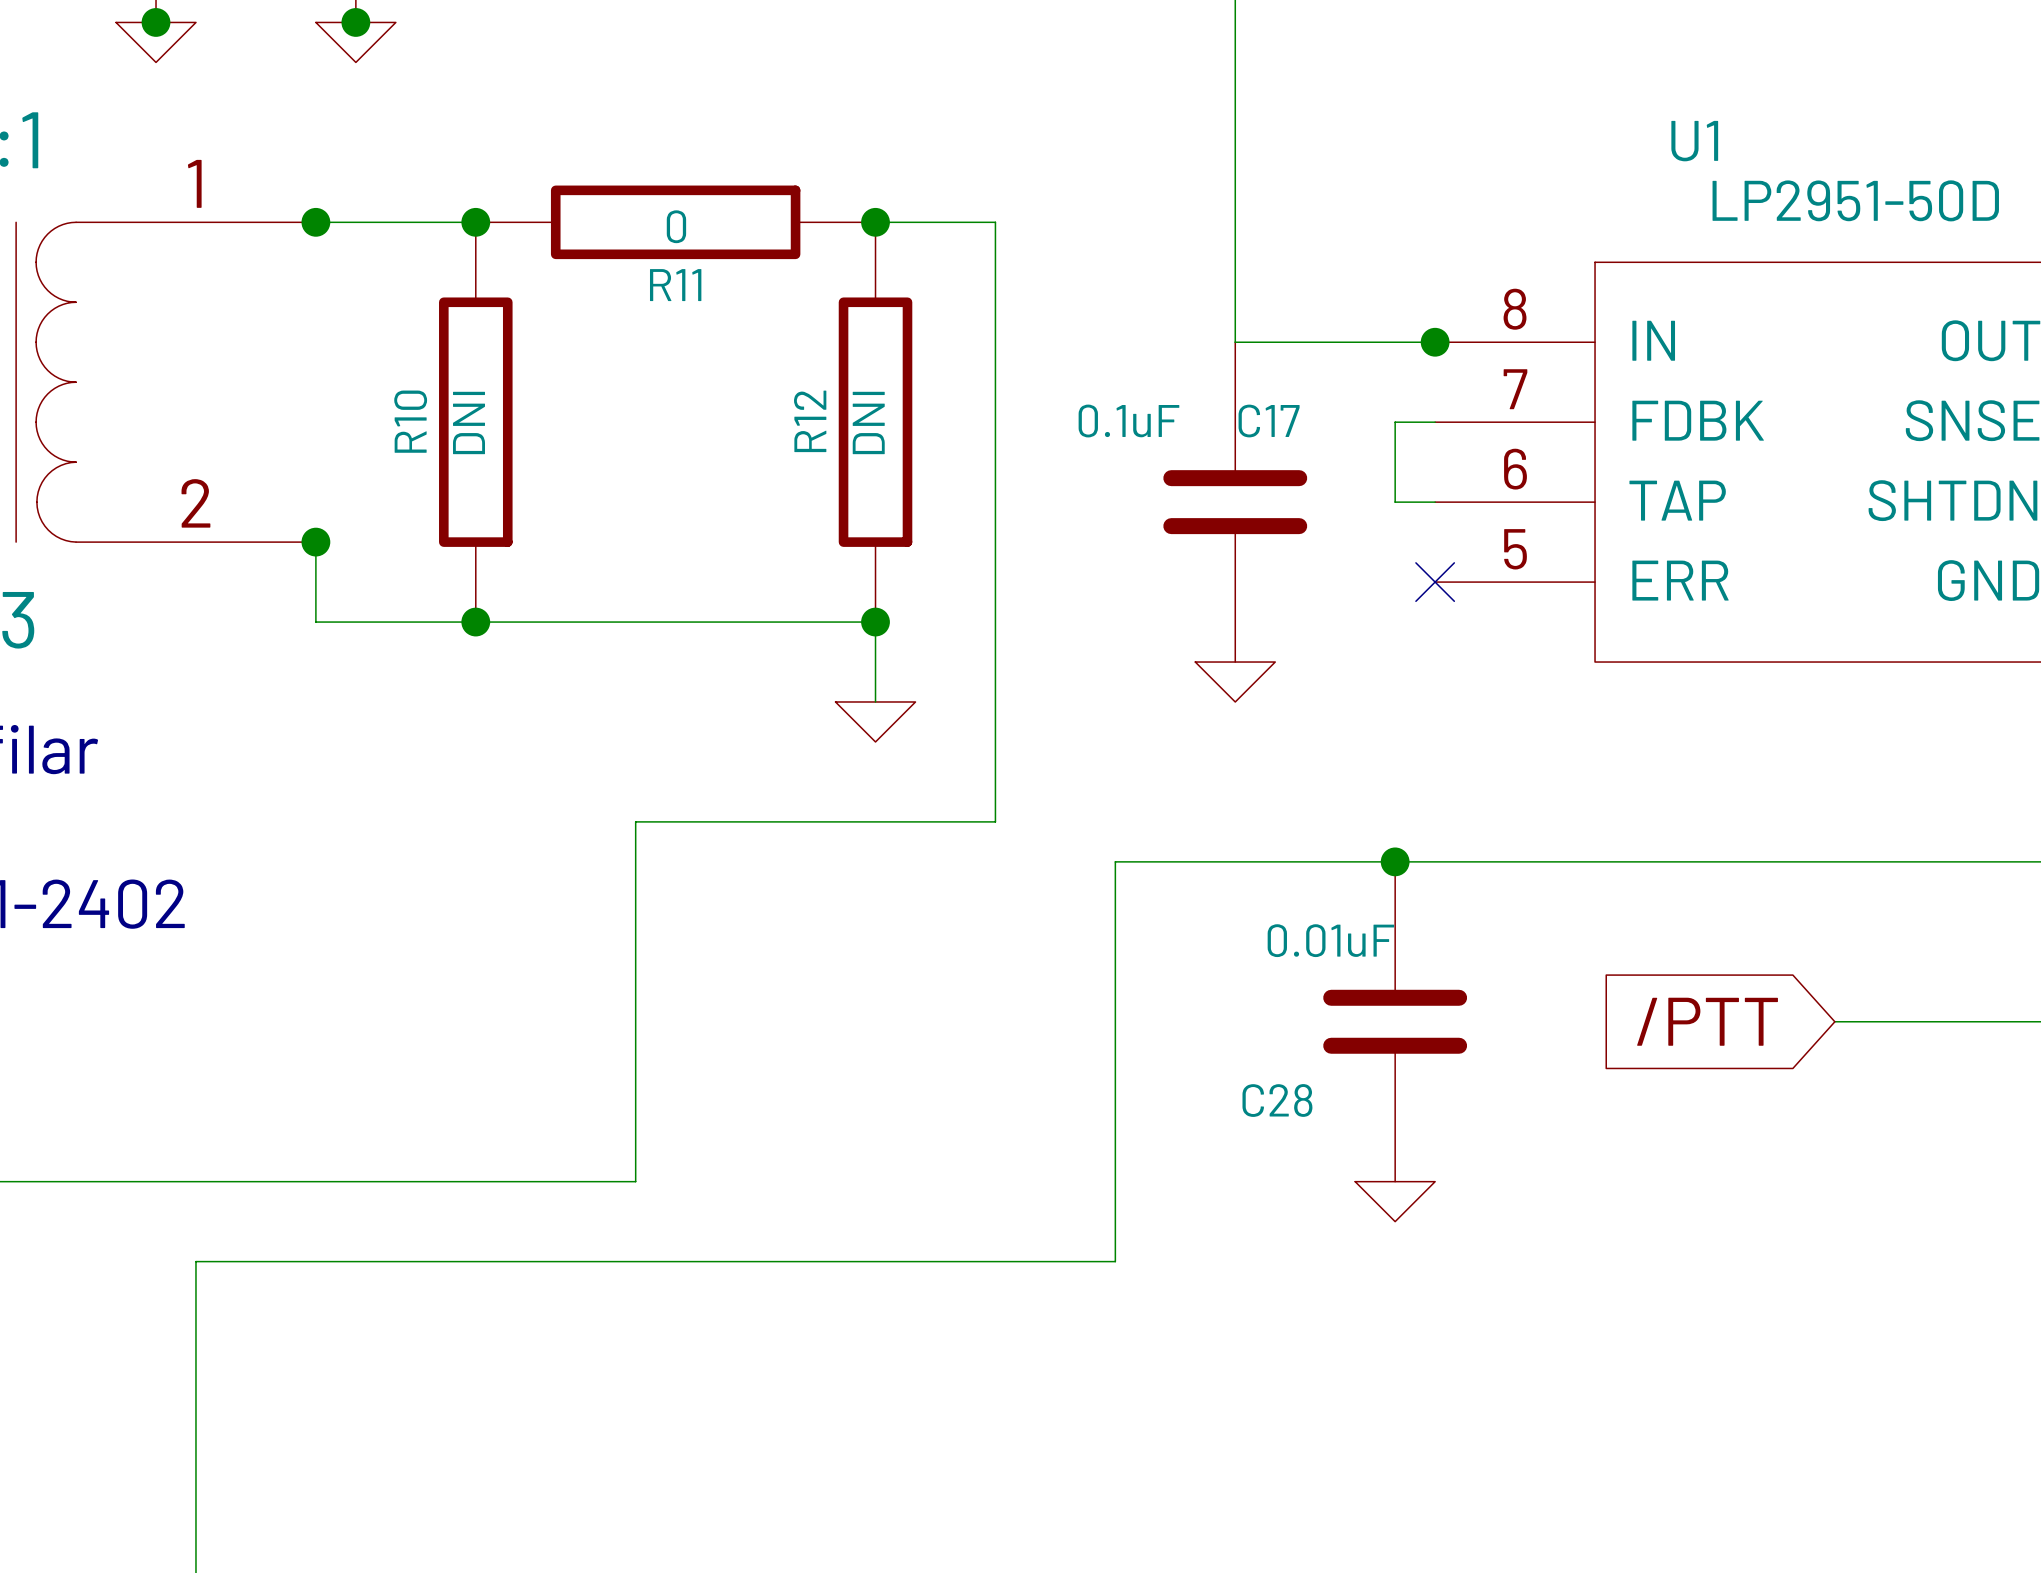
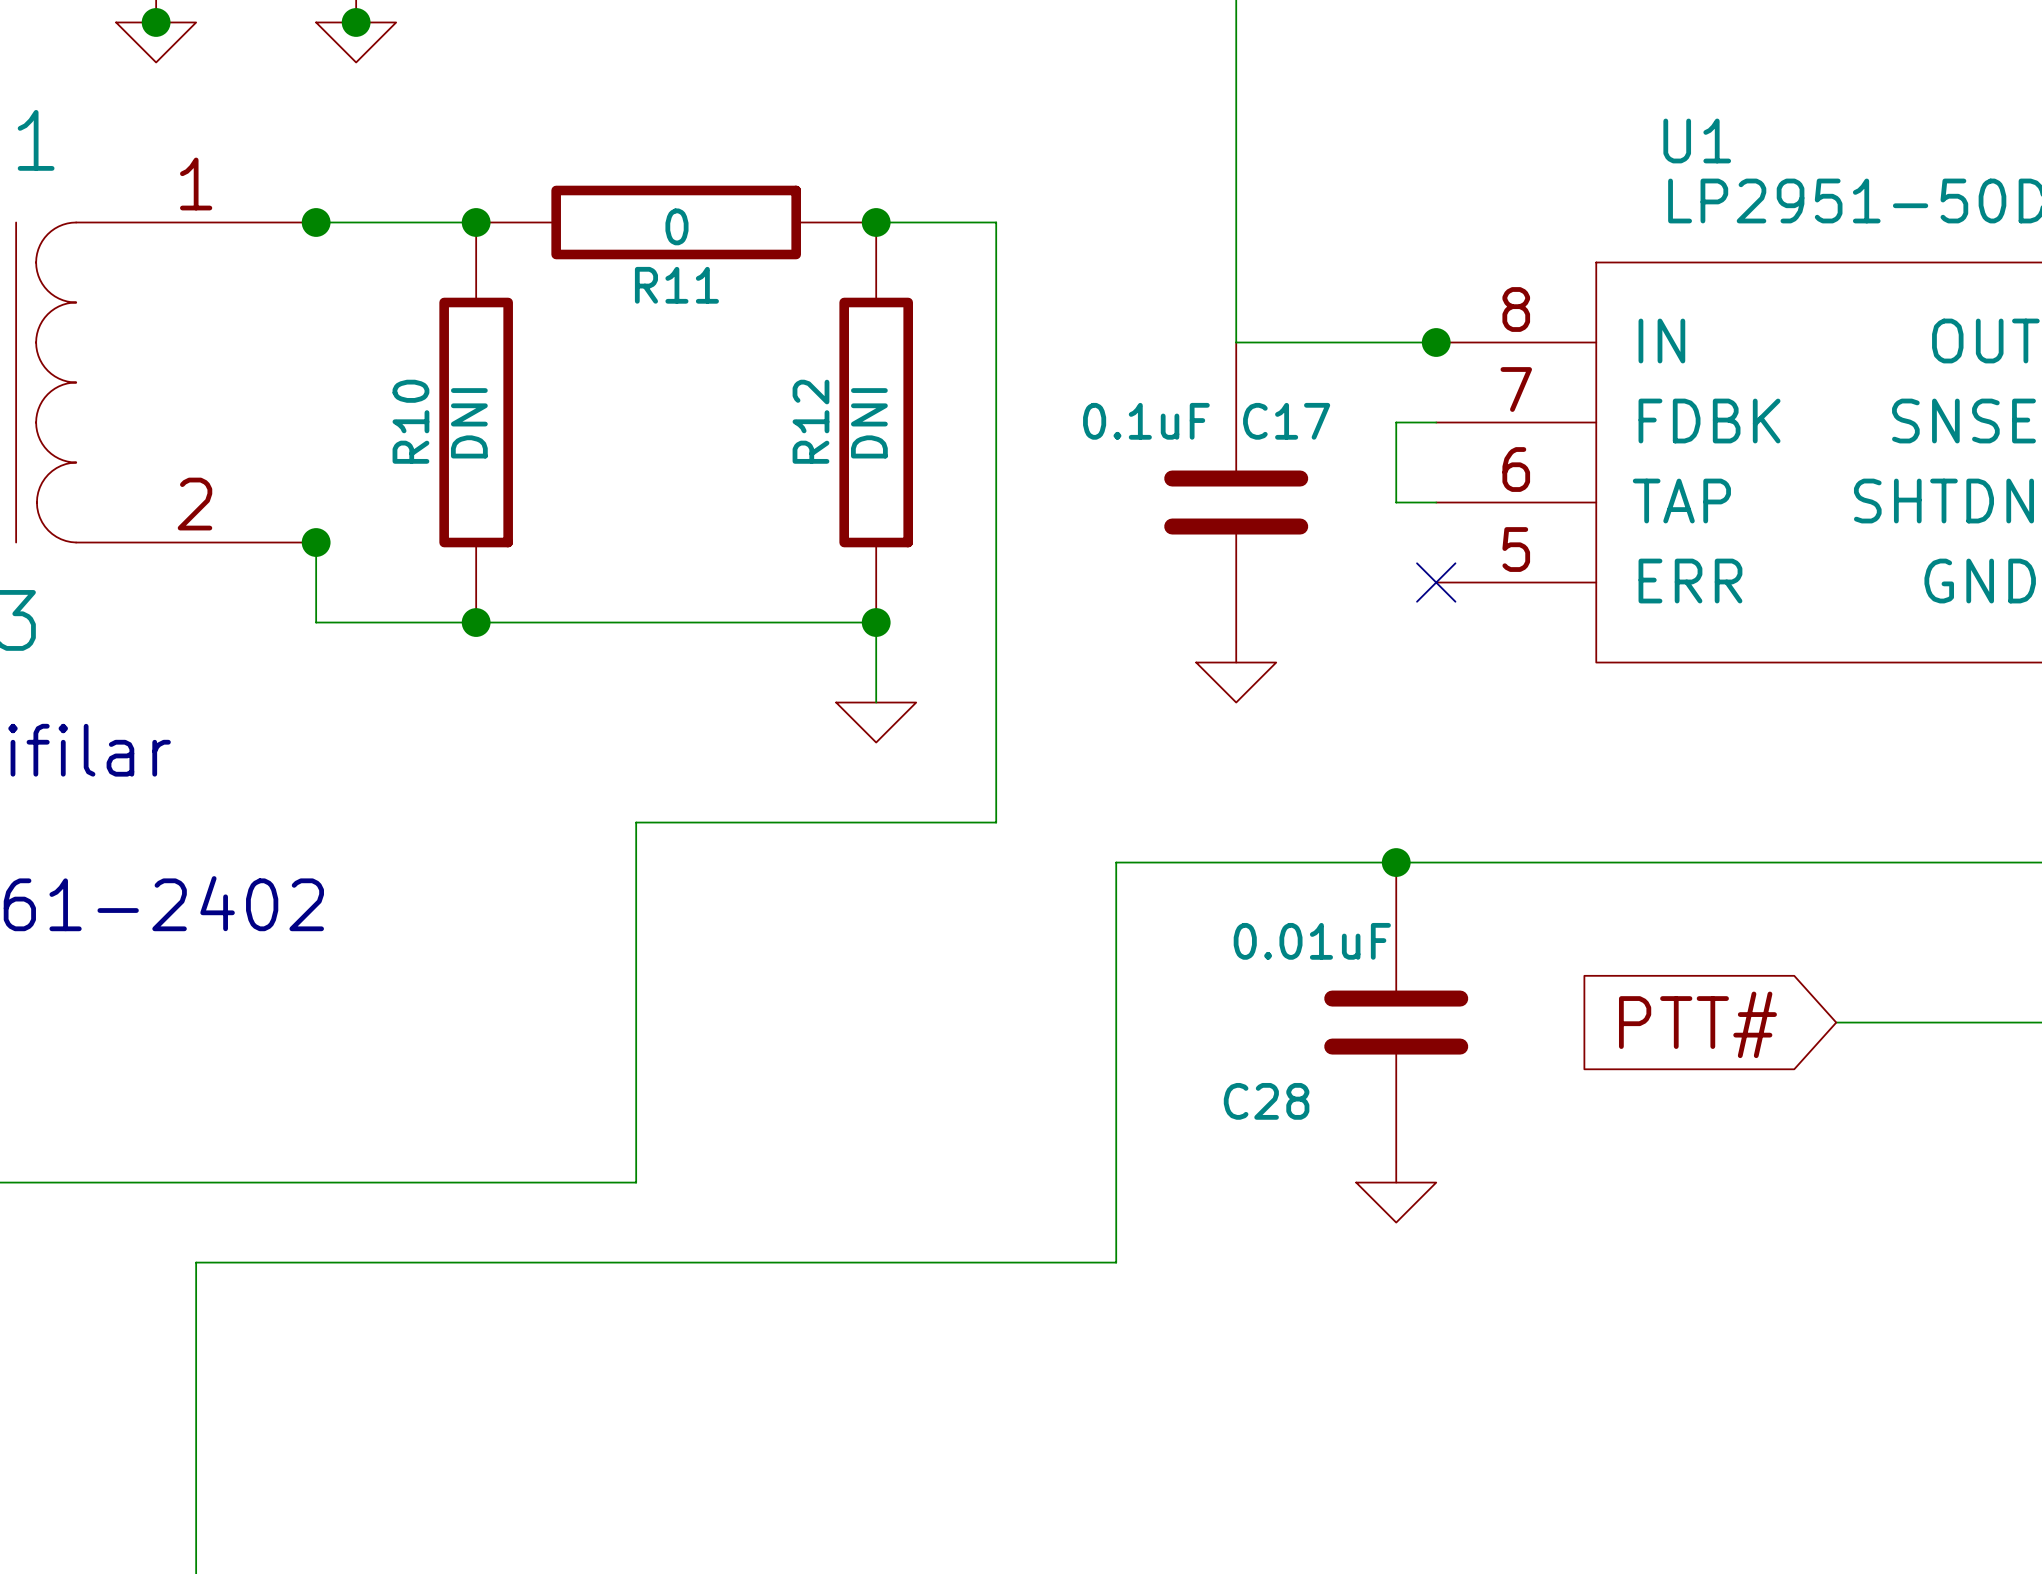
global label: /PTT (1707, 1021) -> PTT# (1697, 1024)

